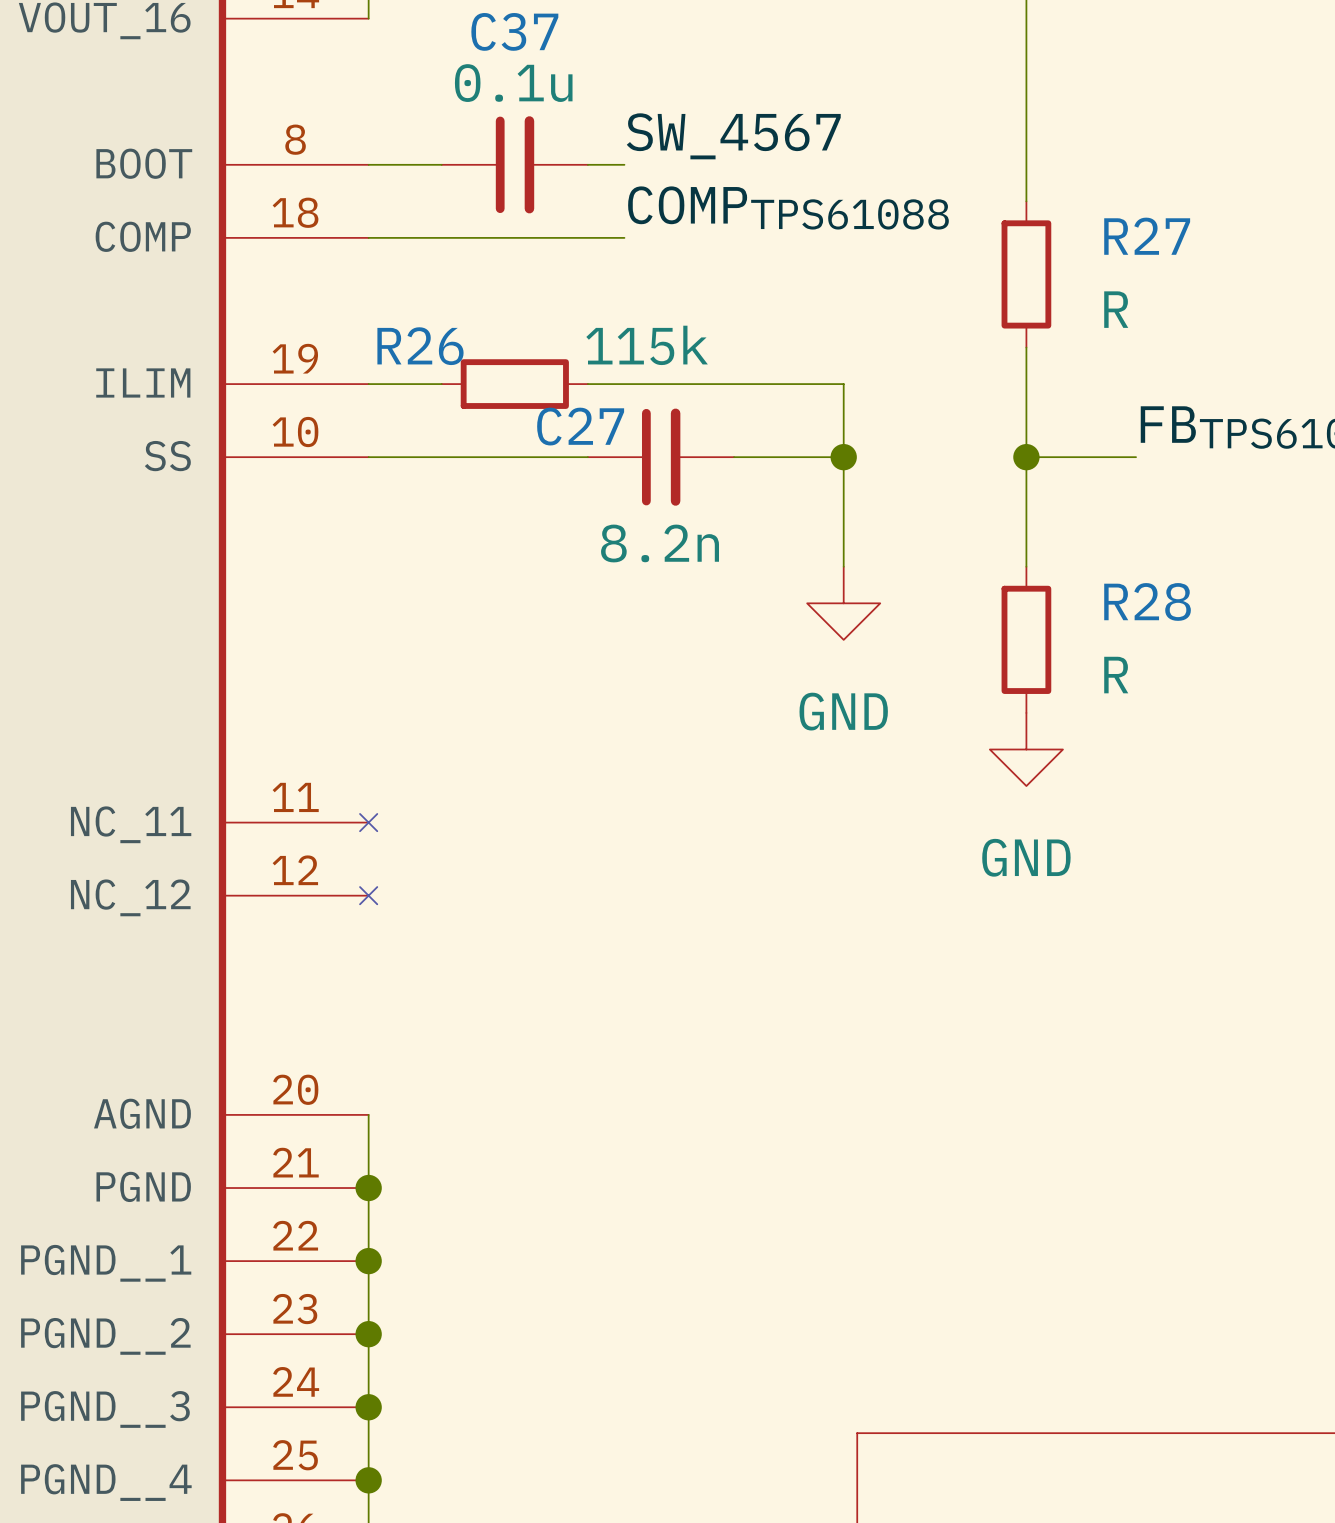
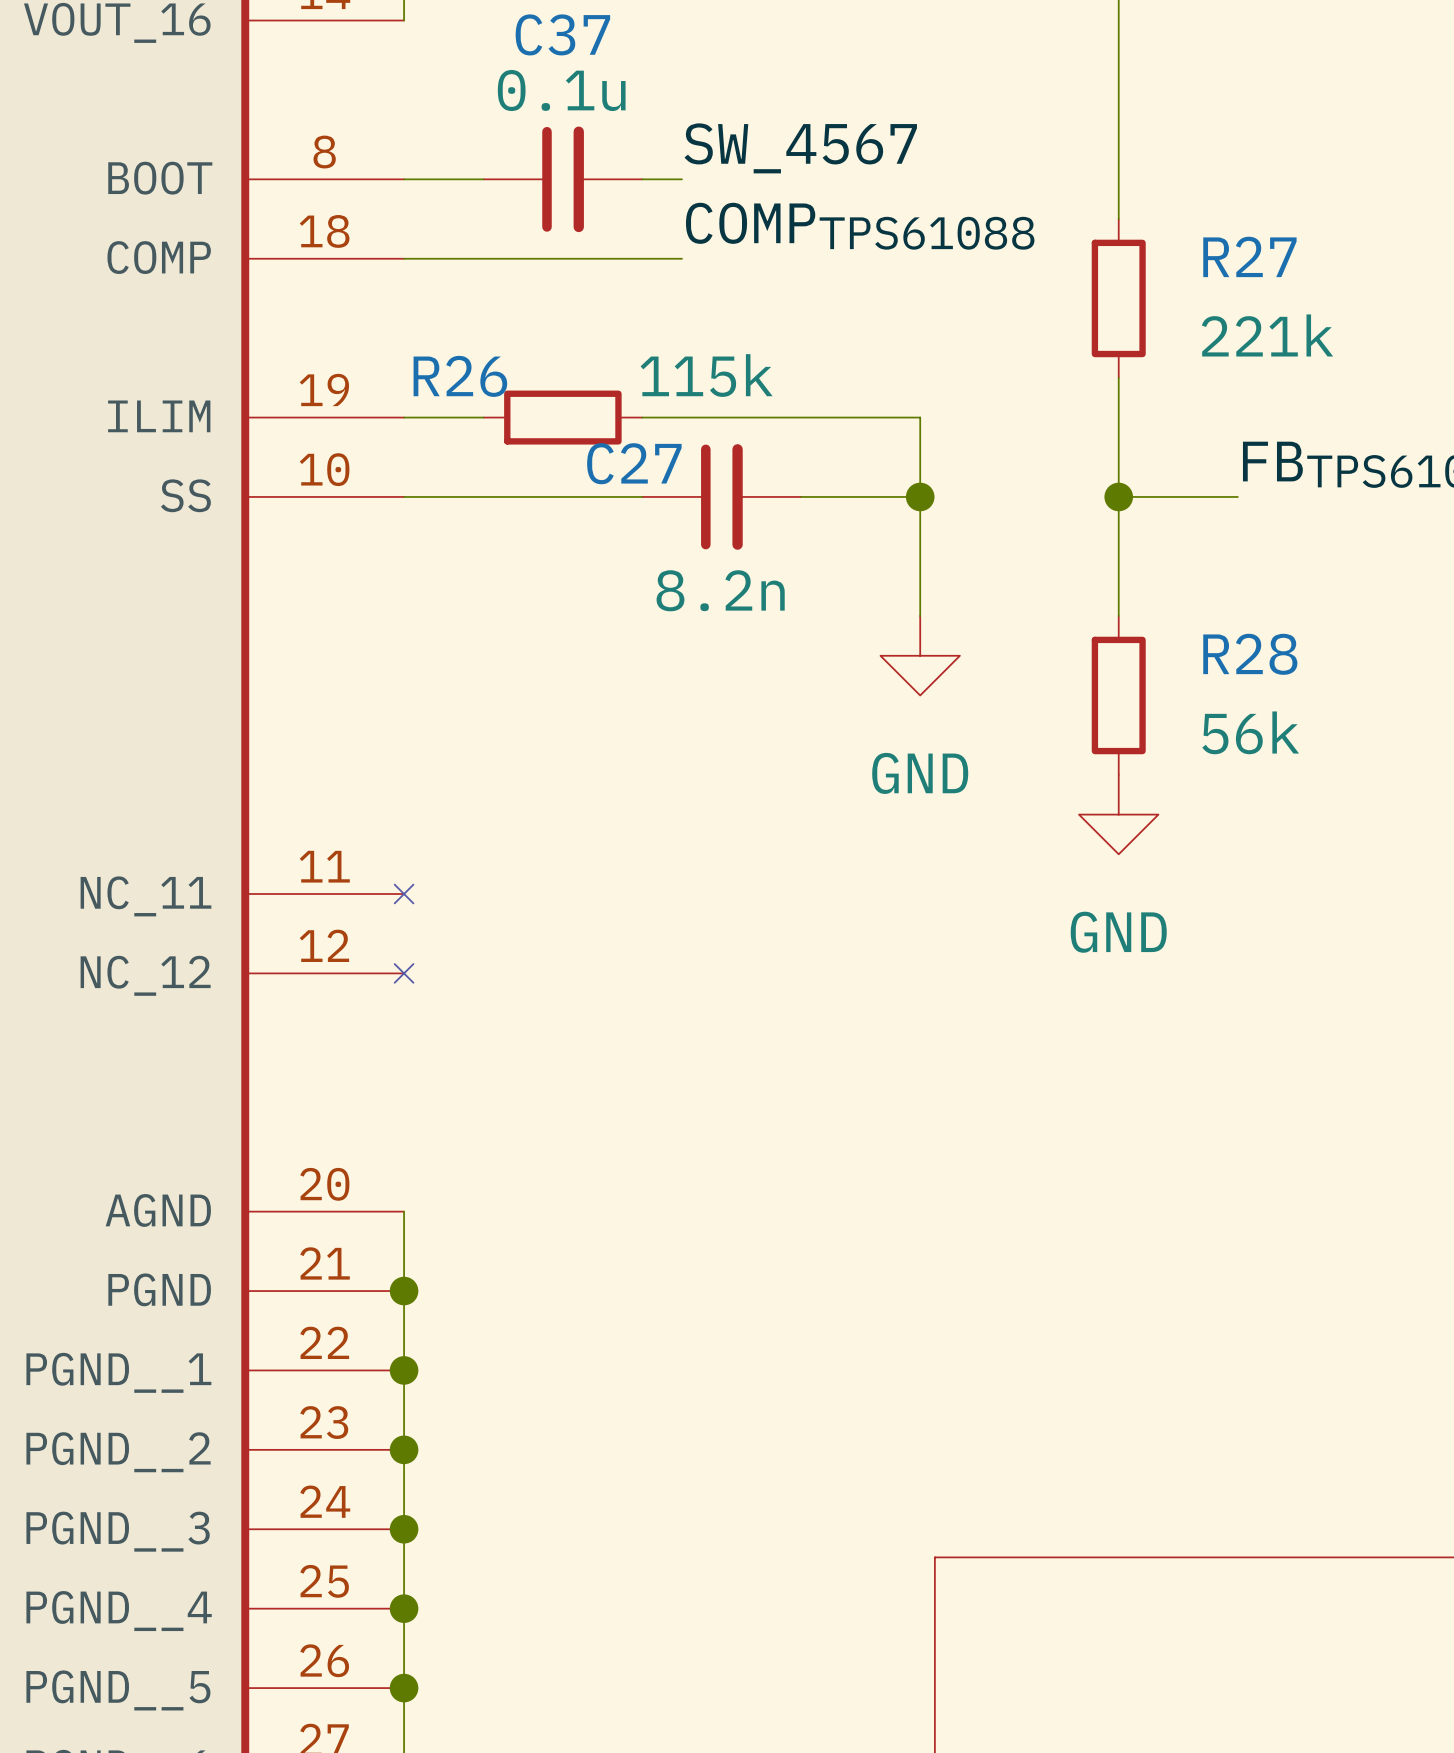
R27 value: R (1116, 309) -> 221k (1267, 335)
R28 value: R (1116, 675) -> 56k (1250, 732)

